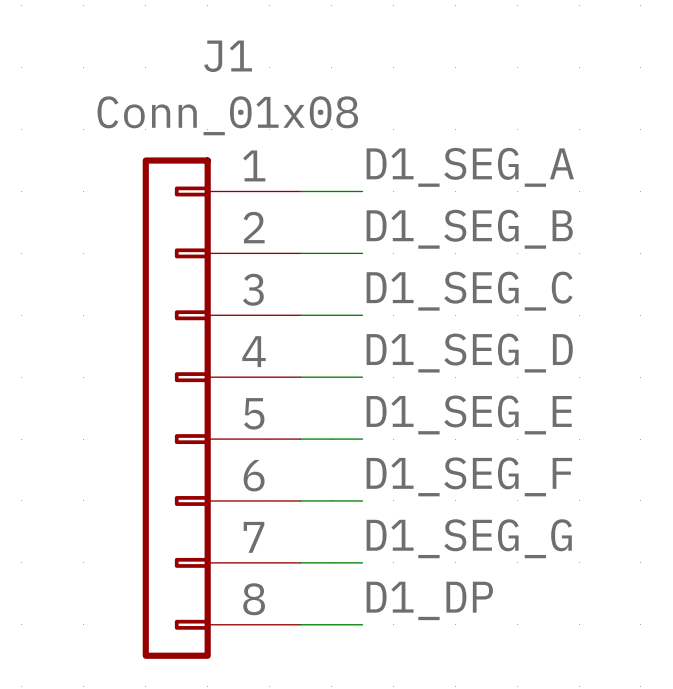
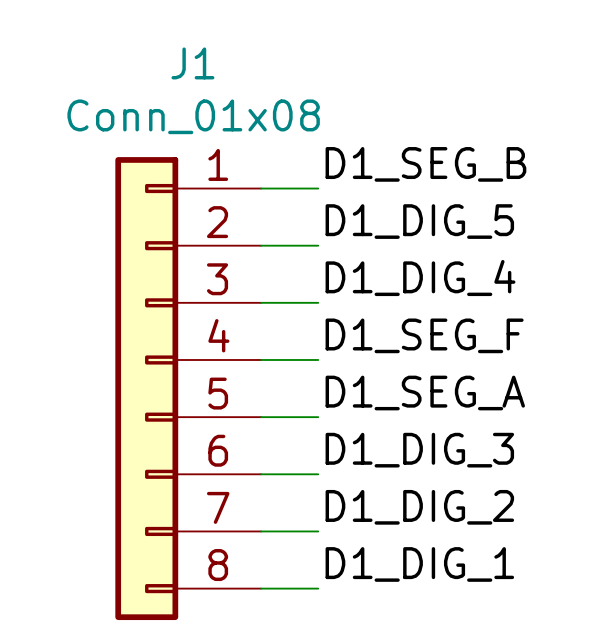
label: D1_SEG_A (470, 167) -> D1_SEG_B (425, 164)
label: D1_SEG_B (469, 229) -> D1_DIG_5 (419, 221)
label: D1_SEG_C (469, 291) -> D1_DIG_4 (420, 278)
label: D1_SEG_D (469, 353) -> D1_SEG_F (424, 335)
label: D1_SEG_E (469, 414) -> D1_SEG_A (425, 393)
label: D1_SEG_F (469, 476) -> D1_DIG_3 (419, 450)
label: D1_SEG_G (469, 538) -> D1_DIG_2 (419, 507)
label: D1_DP (429, 600) -> D1_DIG_1 (419, 564)

